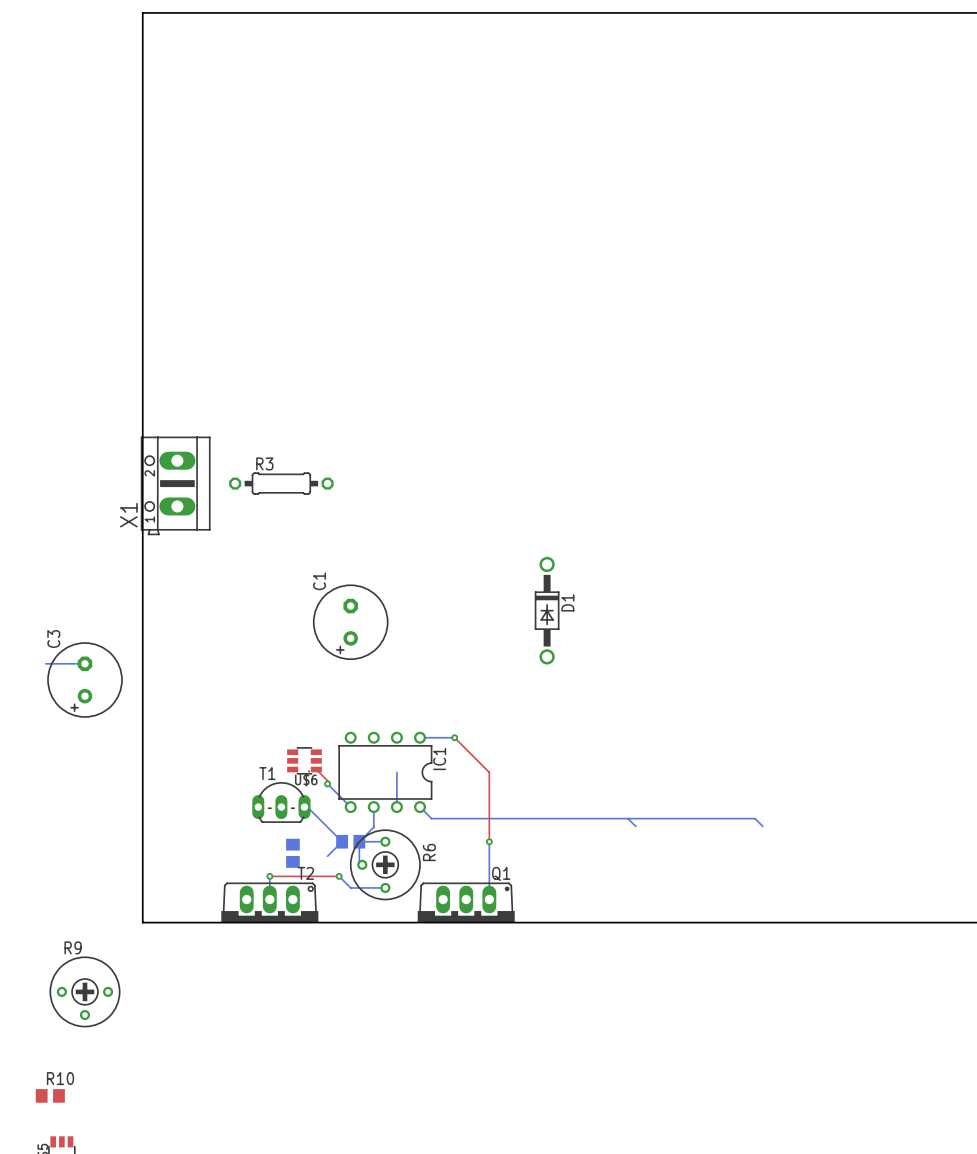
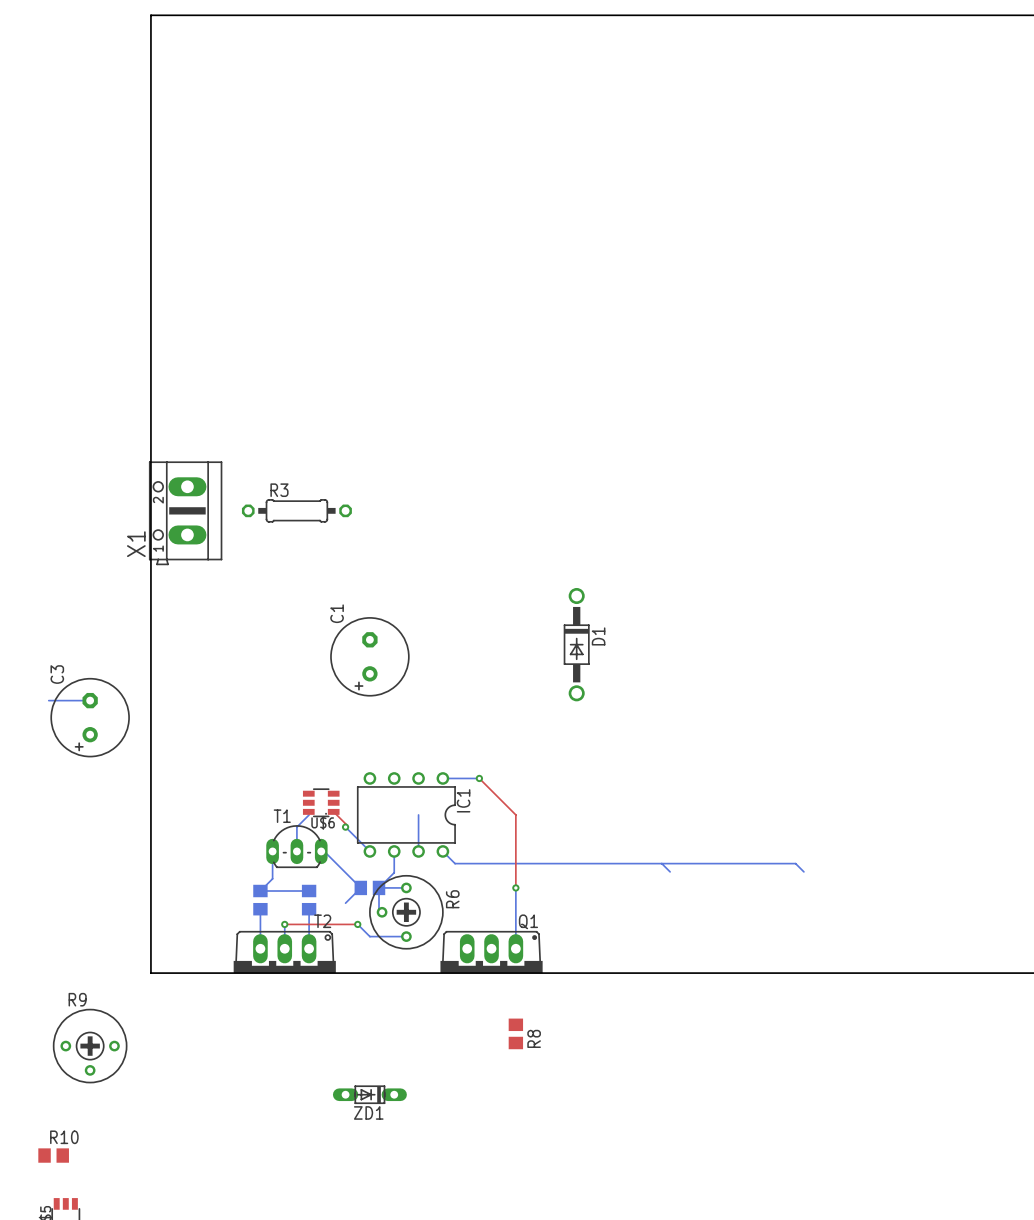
bottom track: none -> (309, 814) (296, 827) (296, 851)
bottom track: none -> (272, 851) (272, 878) (260, 891) (309, 891)
part: none -> (260, 900)
bottom track: none -> (260, 909) (260, 948)
bottom track: none -> (309, 909) (309, 948)
R8: none -> (515, 1033)
ZD1: none -> (369, 1094)

